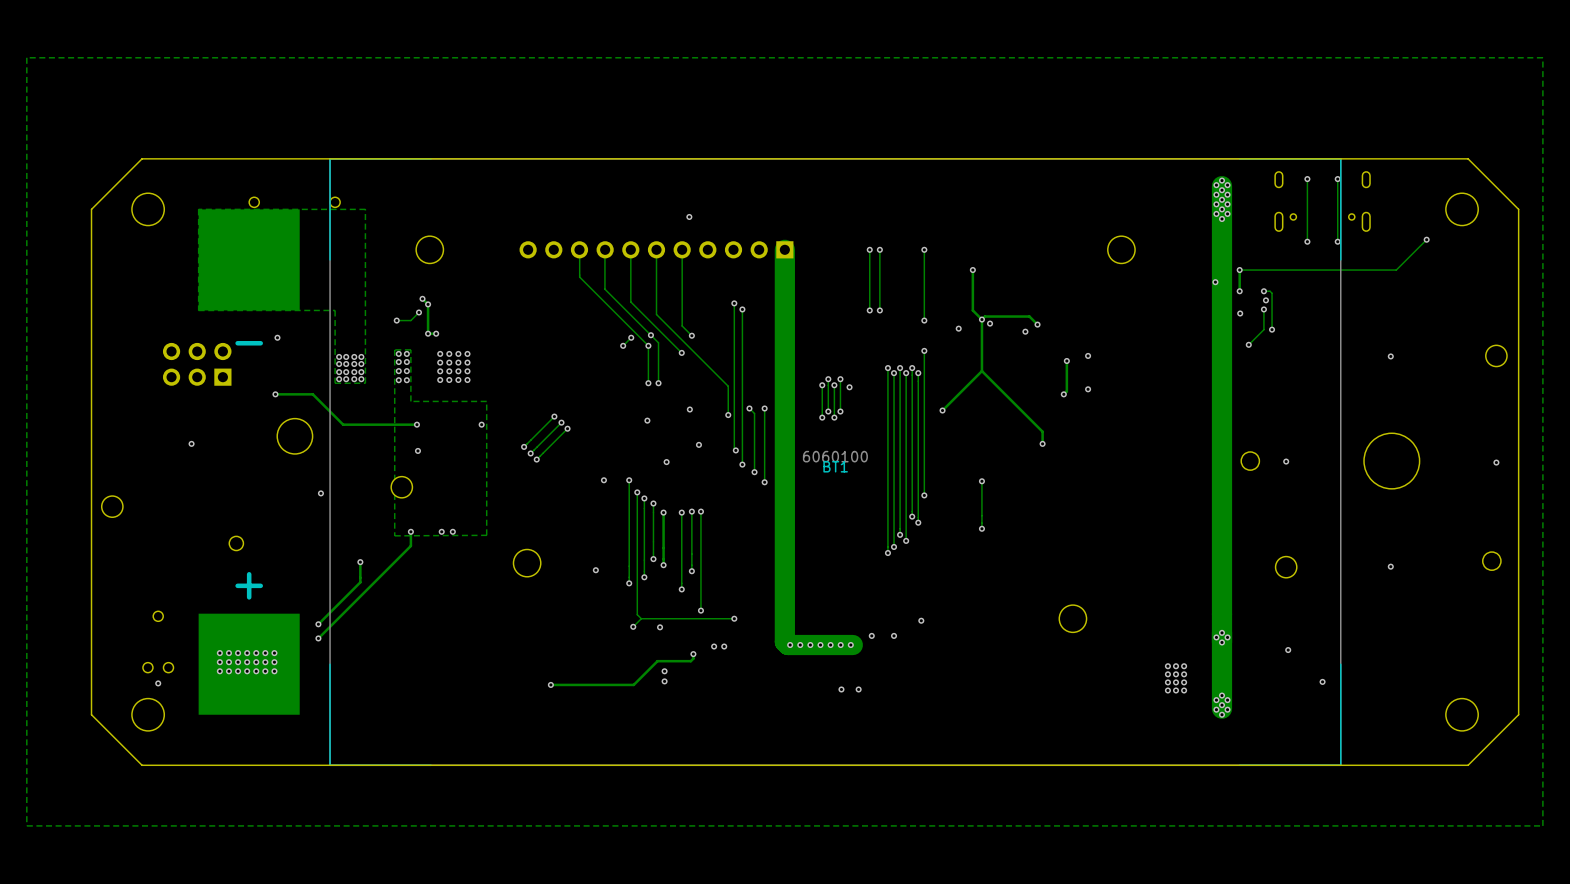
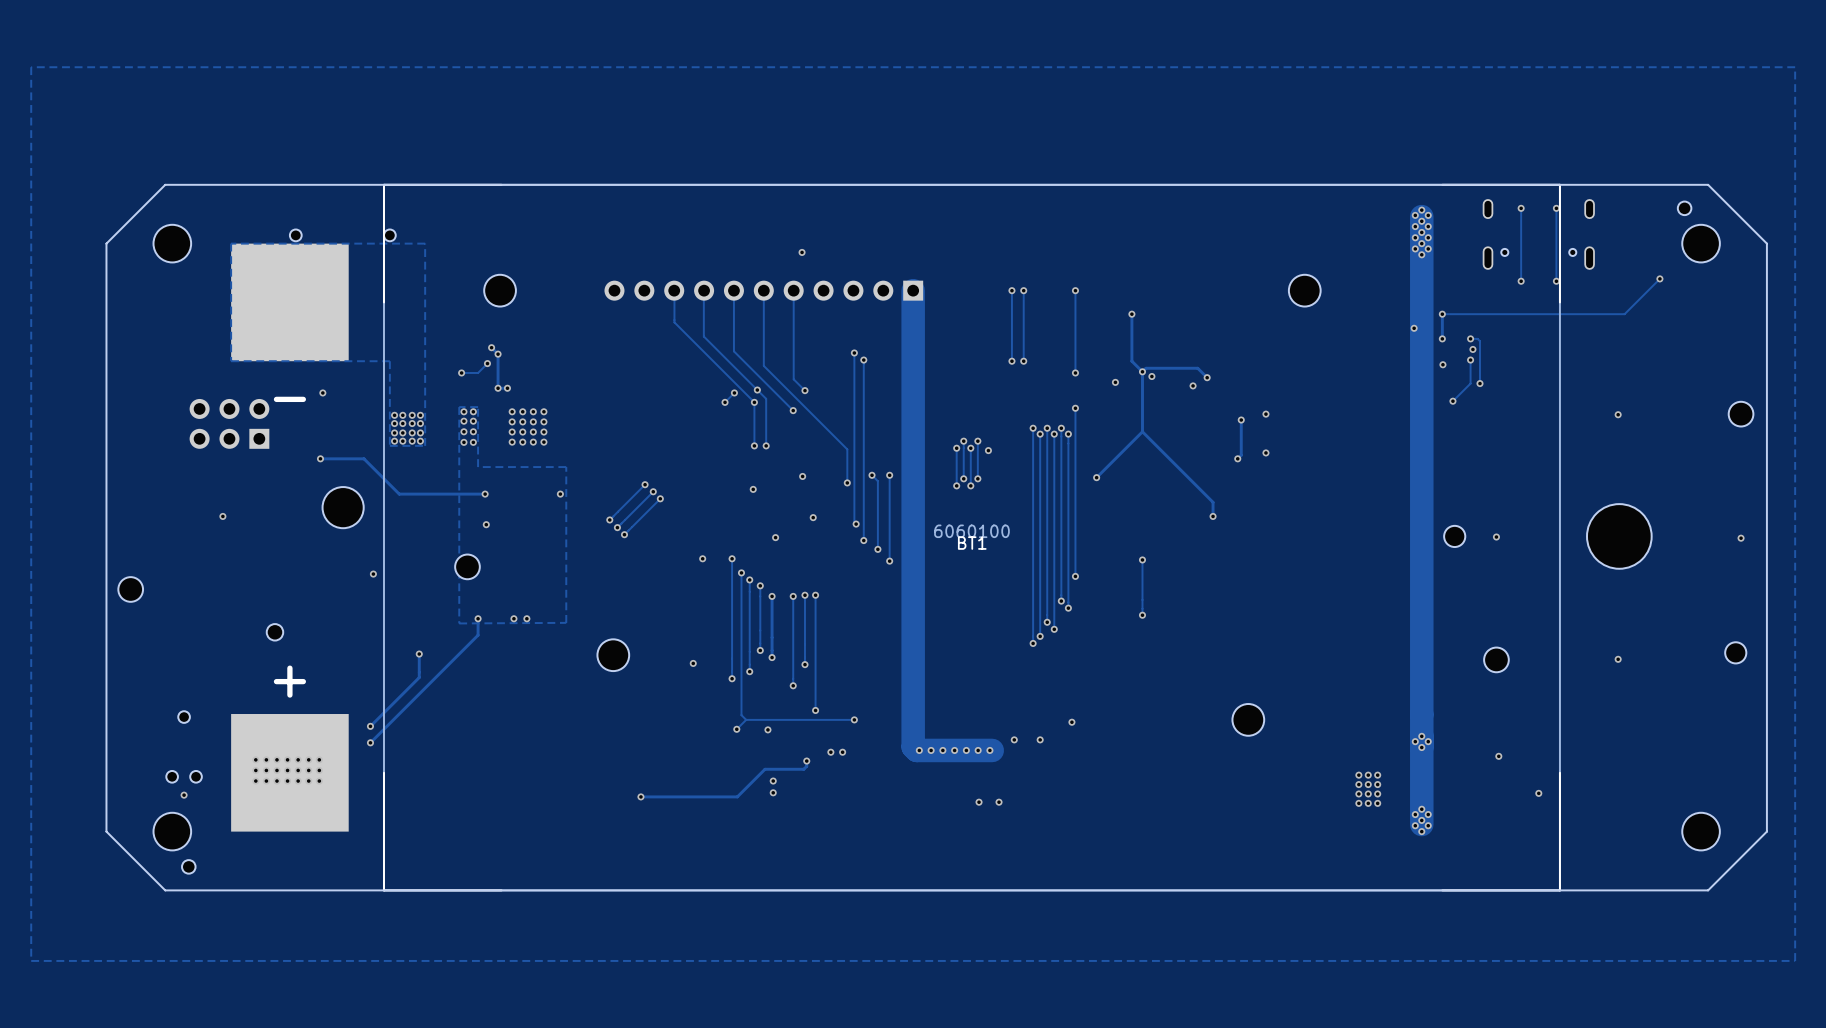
part: none -> (1684, 208)
part: none -> (188, 866)

